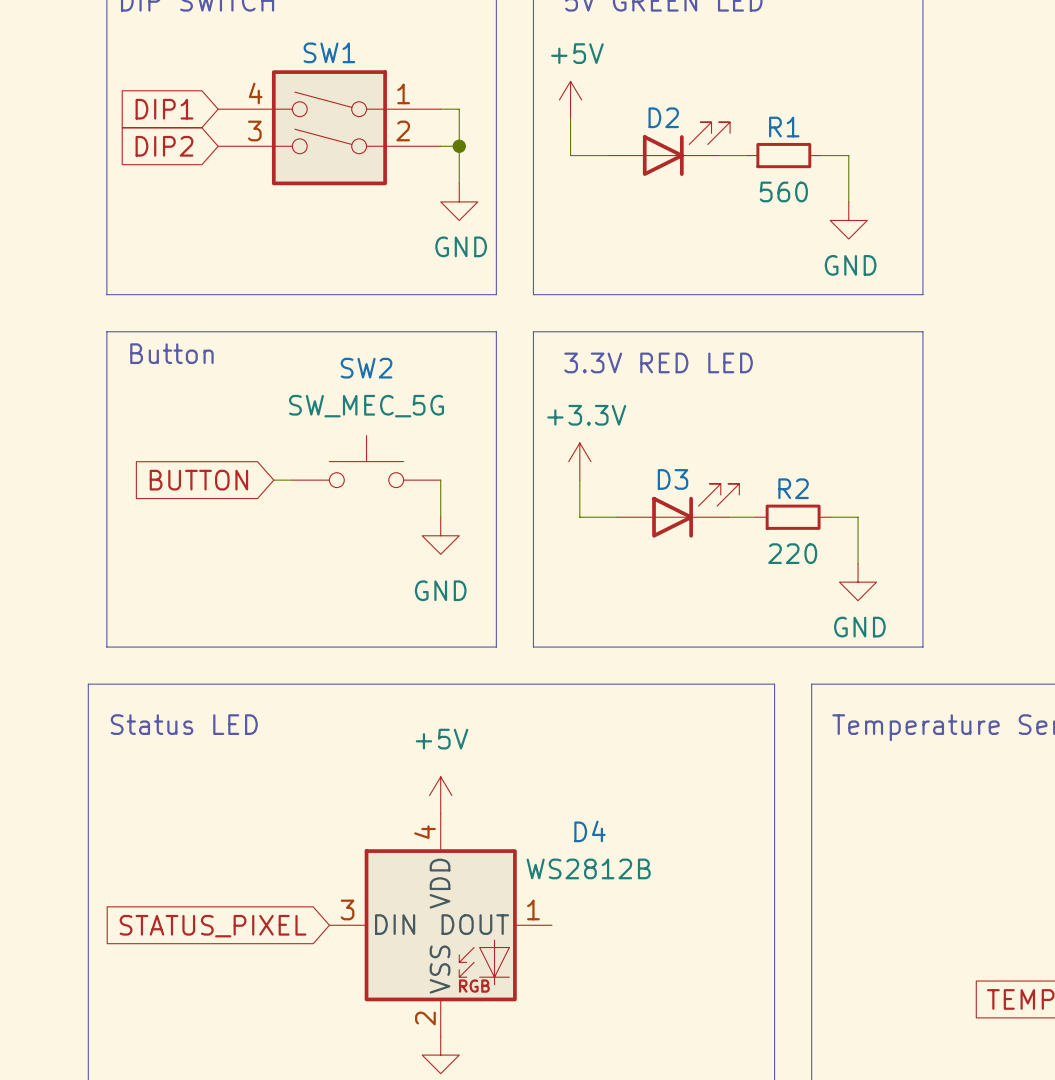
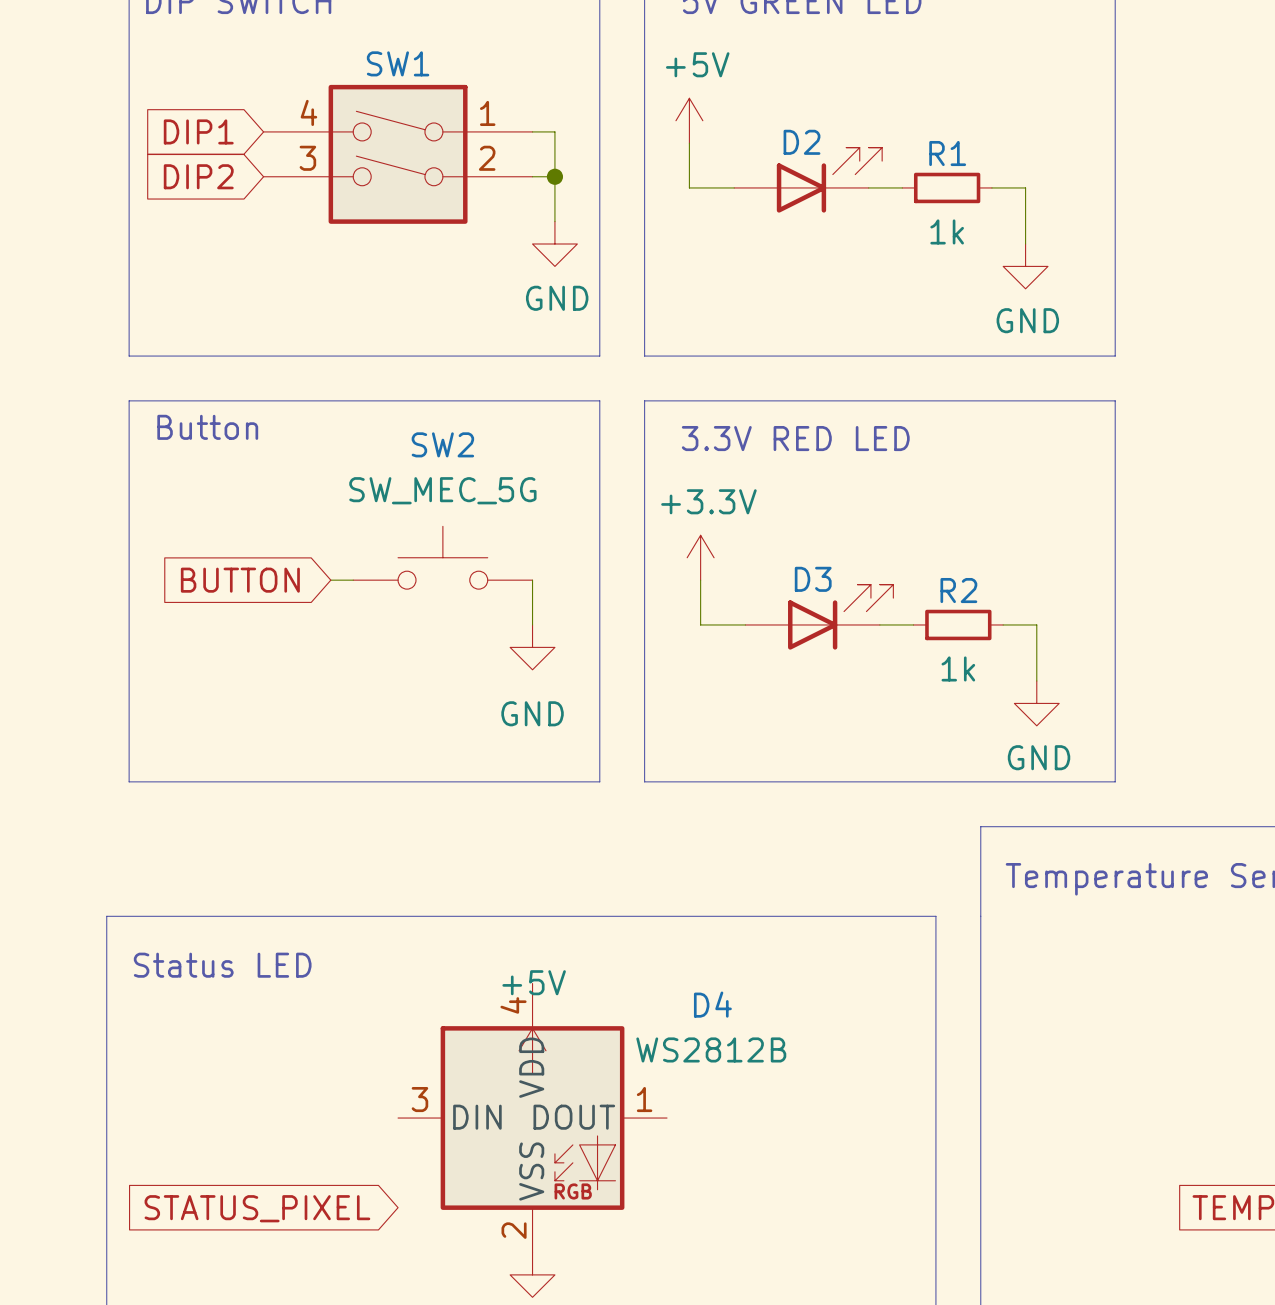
R1 value: 560 (783, 191) -> 1k (947, 231)
R2 value: 220 (792, 553) -> 1k (958, 668)
text position: Status LED (184, 724) -> Status LED (222, 965)
line: (88, 758) (88, 684) (774, 684) (774, 758) -> (106, 916) (935, 916)
power symbol position: +5V (440, 795) -> +5V (532, 1050)
global label position: STATUS_PIXEL (213, 926) -> STATUS_PIXEL (257, 1208)

